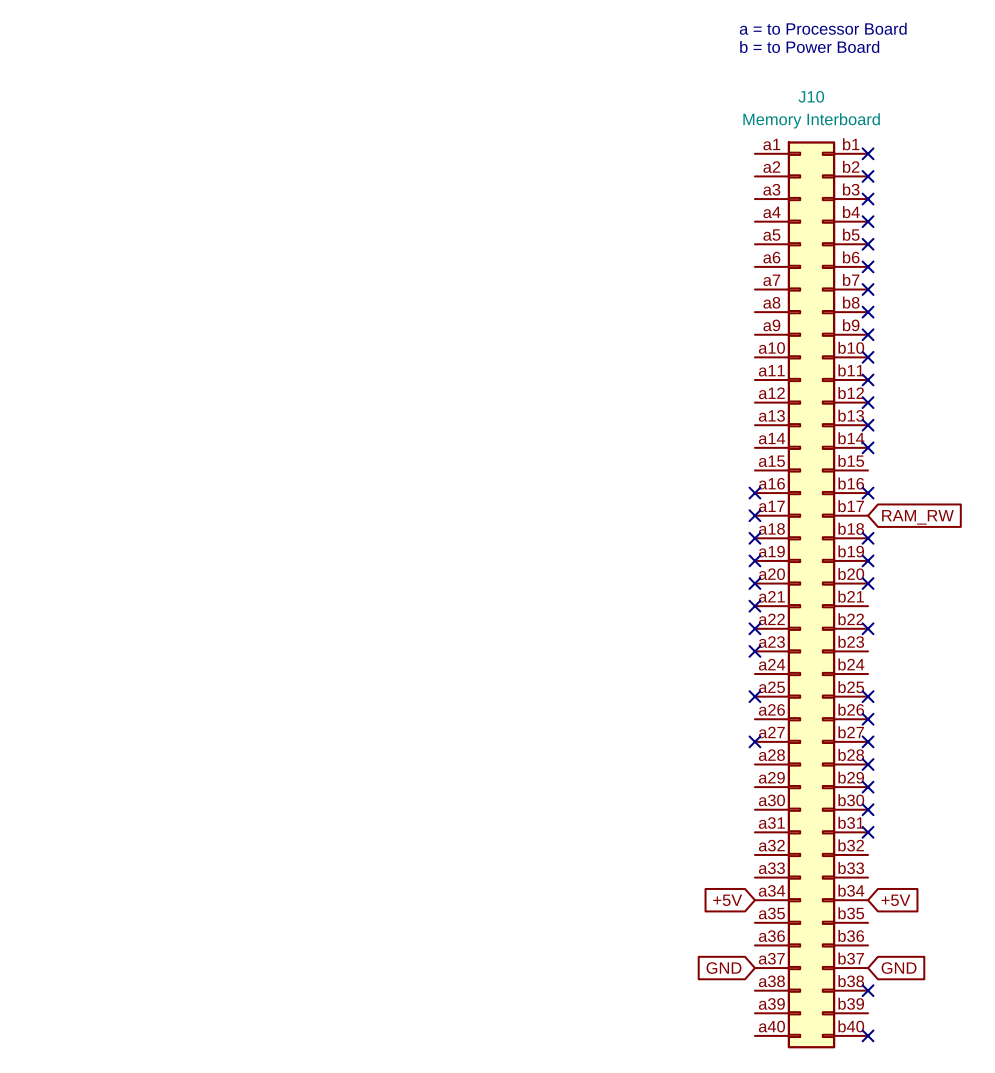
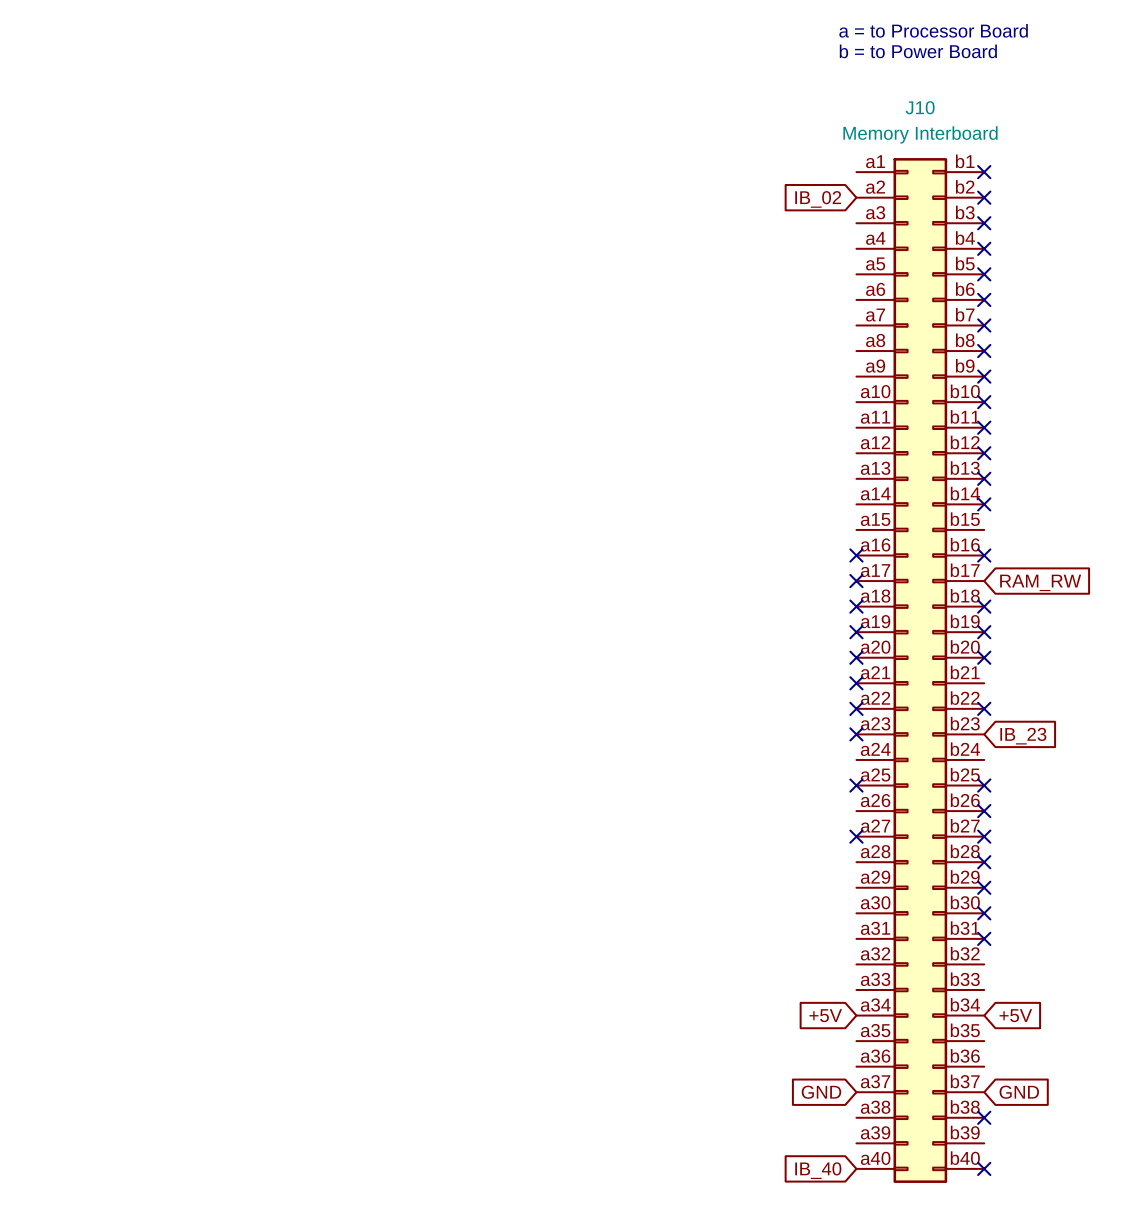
global label: none -> IB_02 (818, 199)
global label: none -> IB_23 (1023, 736)
global label: none -> IB_40 (818, 1170)

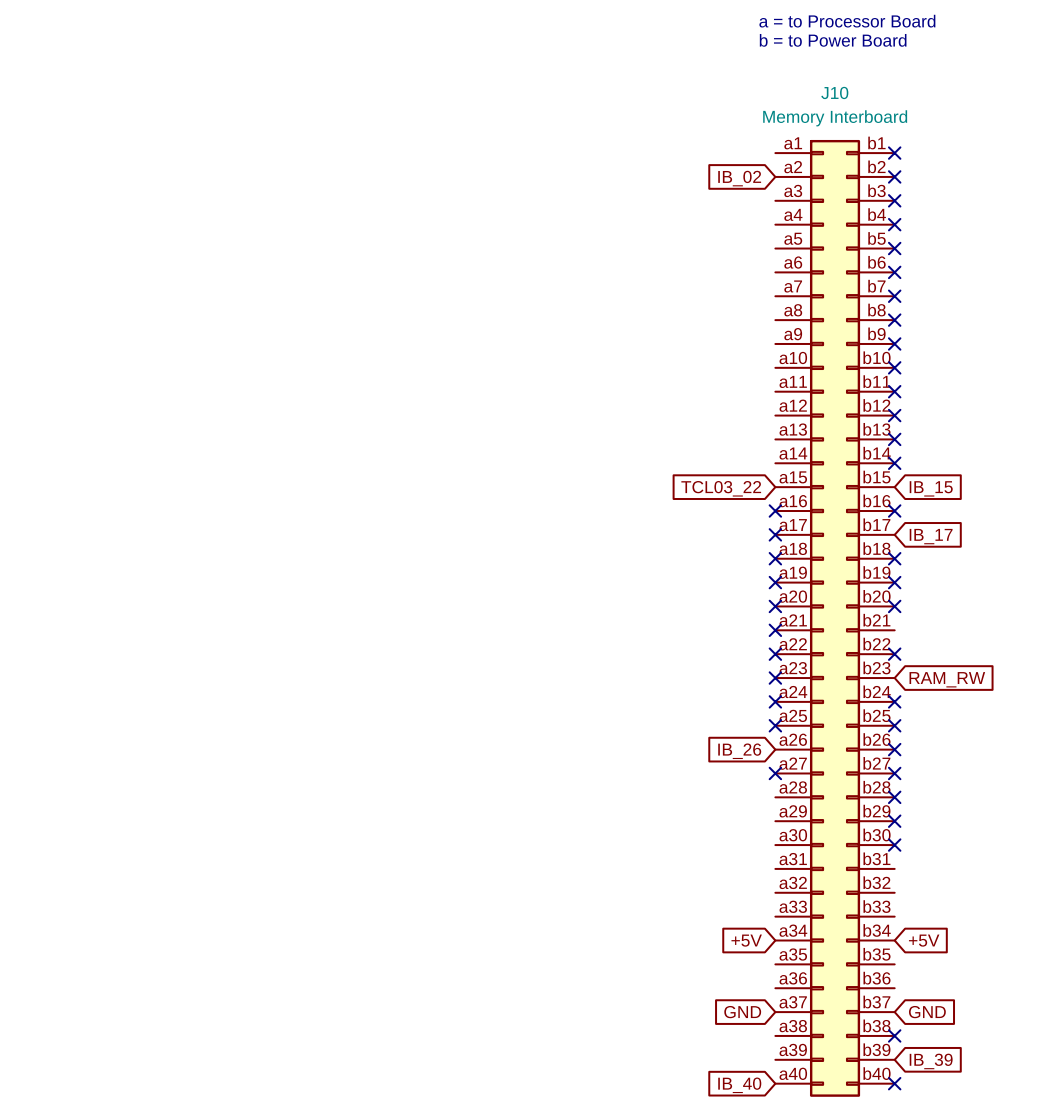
global label: none -> TCL03_22 (721, 488)
global label: none -> IB_15 (931, 488)
global label: RAM_RW (1040, 582) -> IB_17 (931, 536)
global label: IB_23 (1023, 736) -> RAM_RW (947, 679)
no-connect mark: none -> (775, 701)
no-connect mark: none -> (894, 701)
global label: none -> IB_26 (739, 751)
no-connect mark: (984, 938) -> none
global label: none -> IB_39 (931, 1061)

